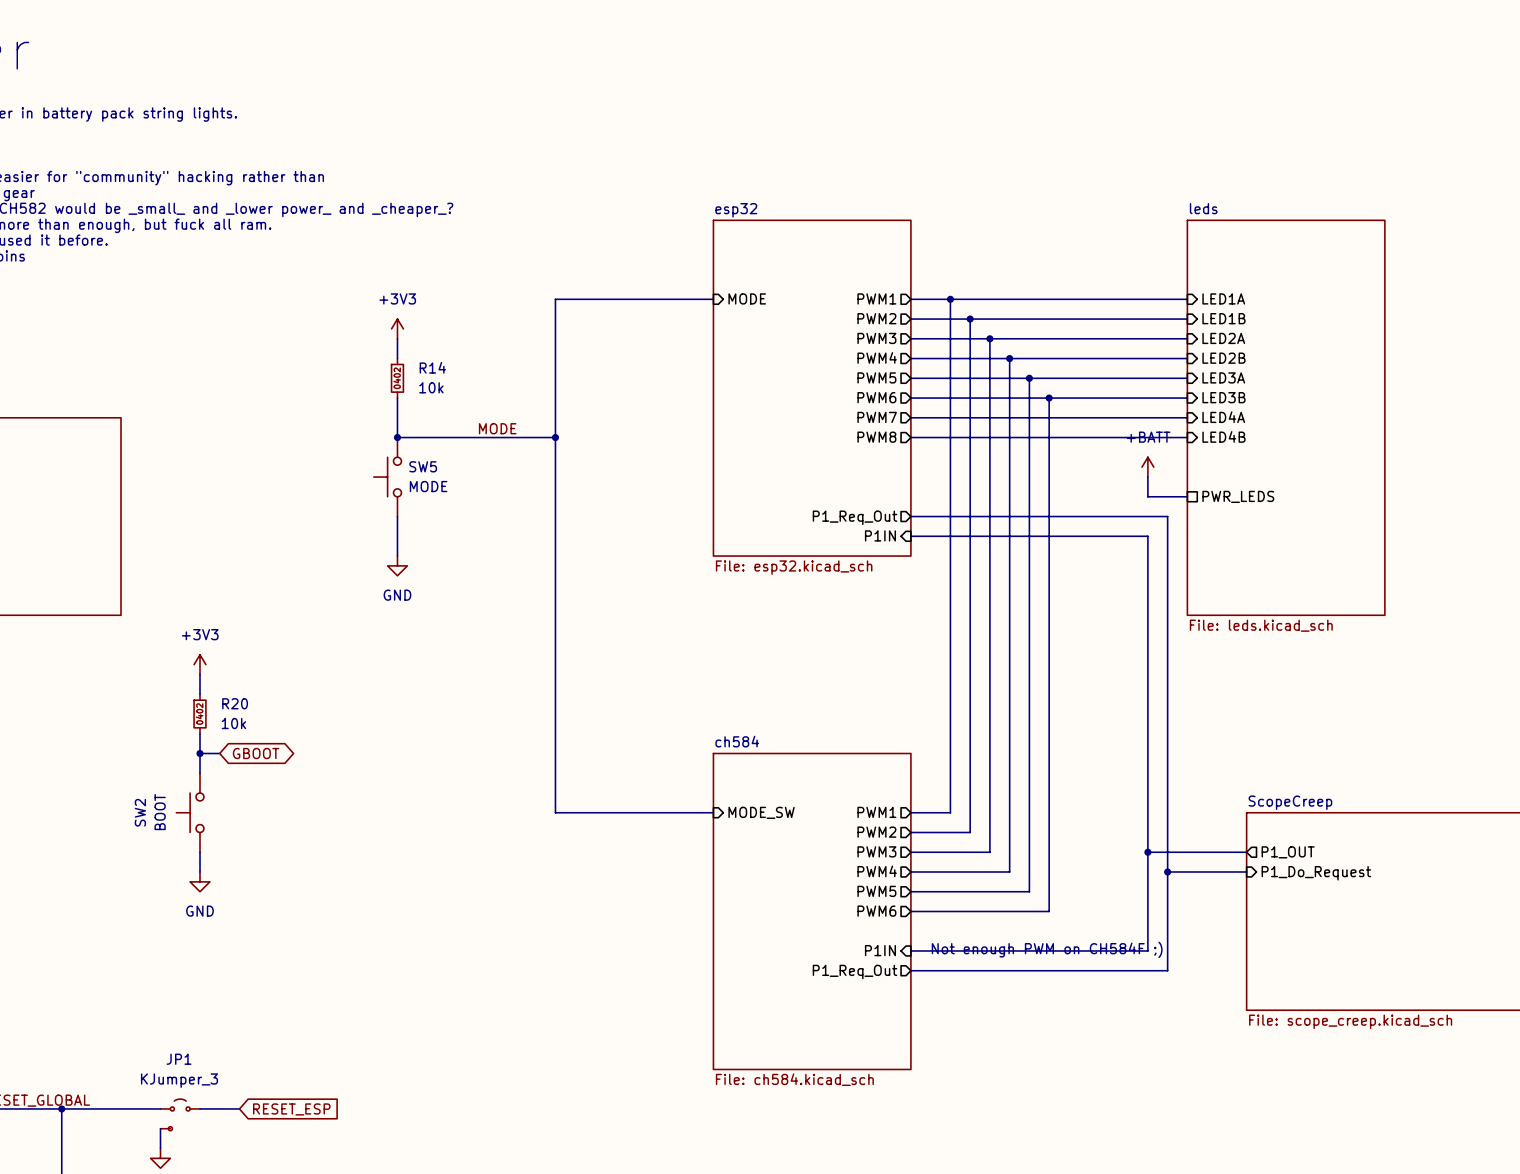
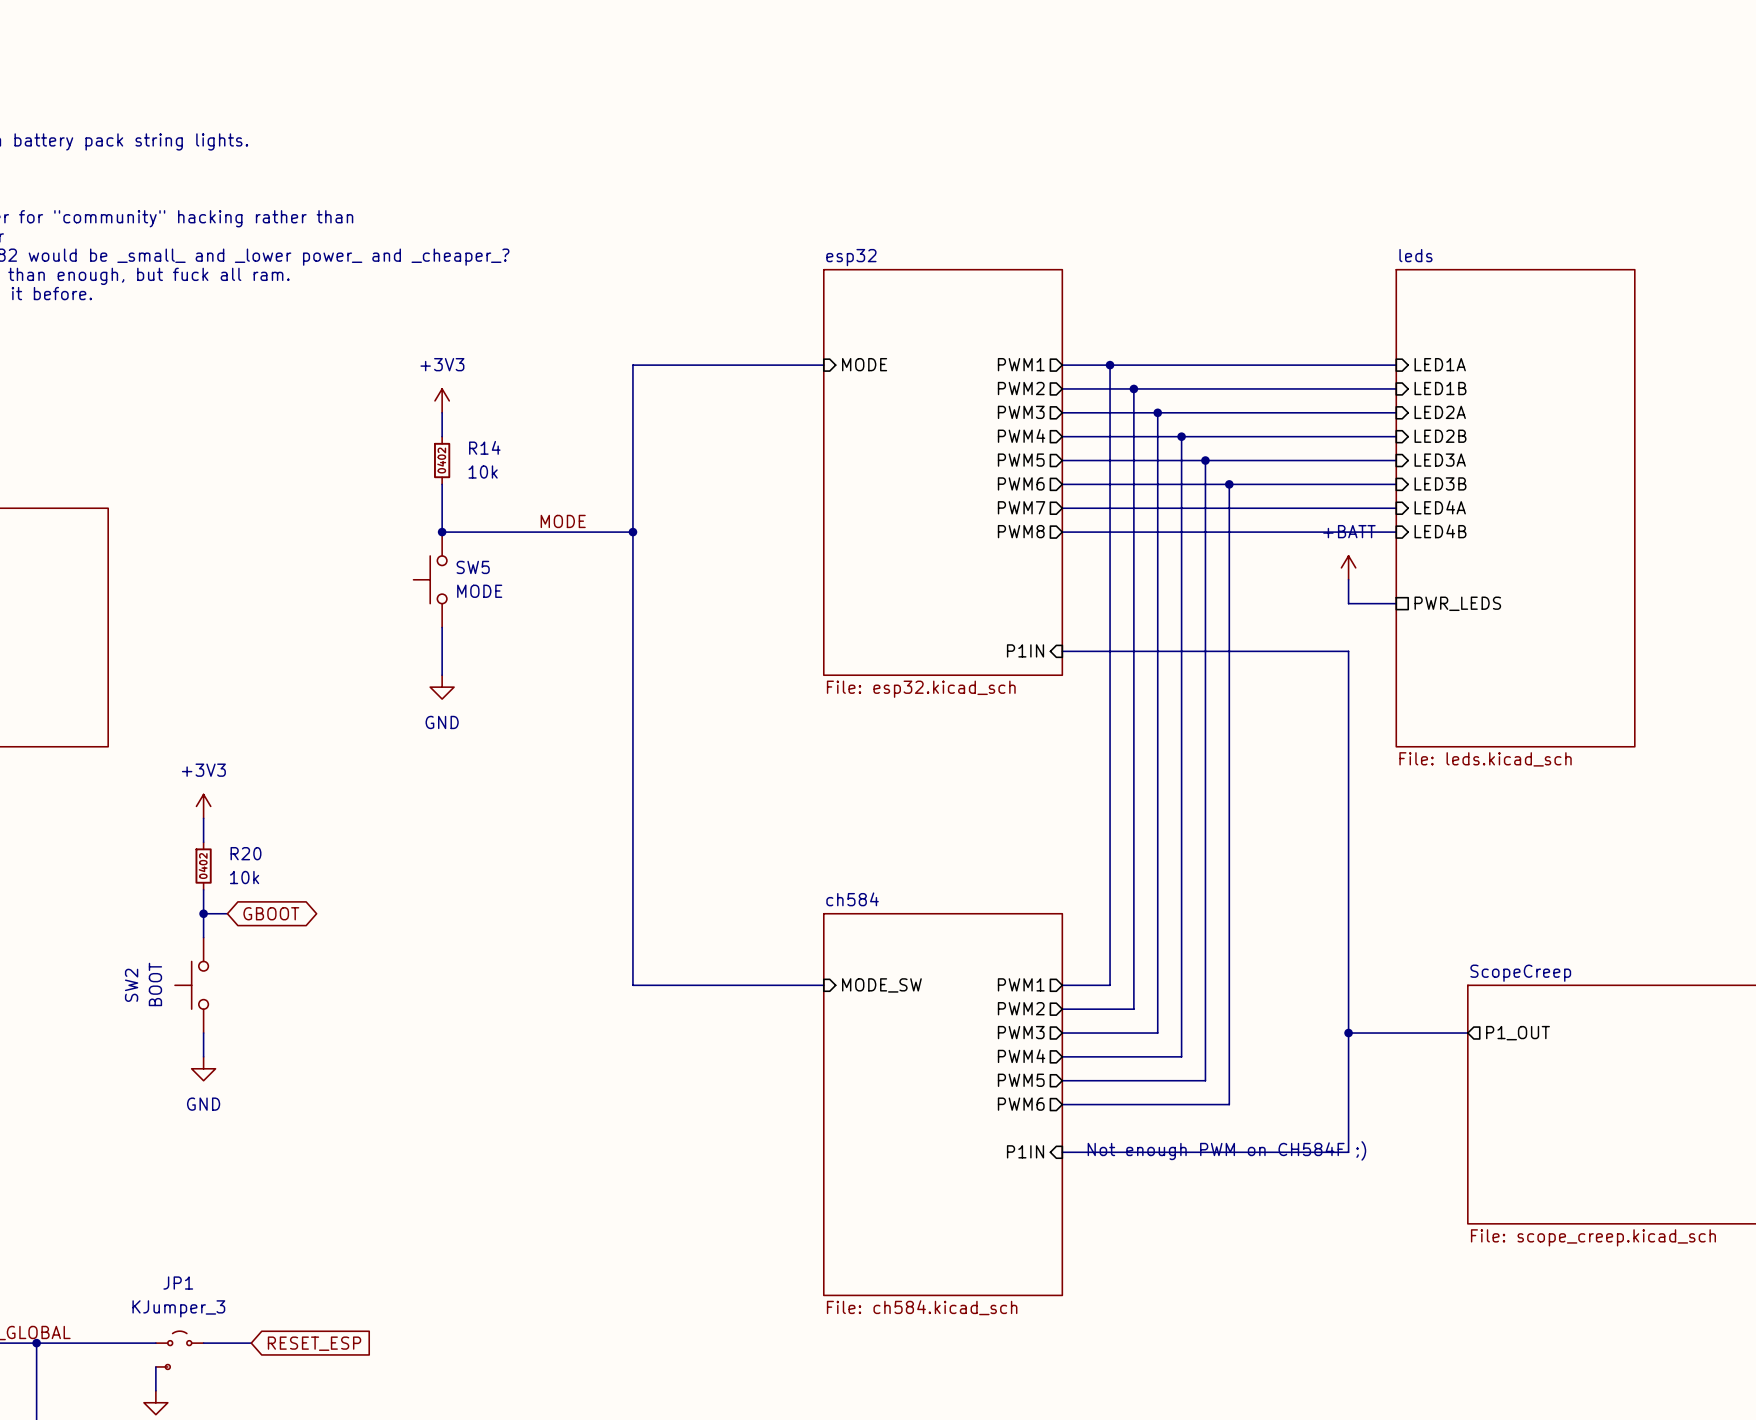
wire: (910, 516) (1167, 516) (1167, 970) (910, 970) -> none
sheet pin: P1_Req_Out (855, 517) -> none
wire: (1167, 871) (1246, 871) -> none
junction: (1167, 871) -> none
sheet pin: P1_Do_Request (1316, 873) -> none
sheet pin: P1_Req_Out (855, 972) -> none

